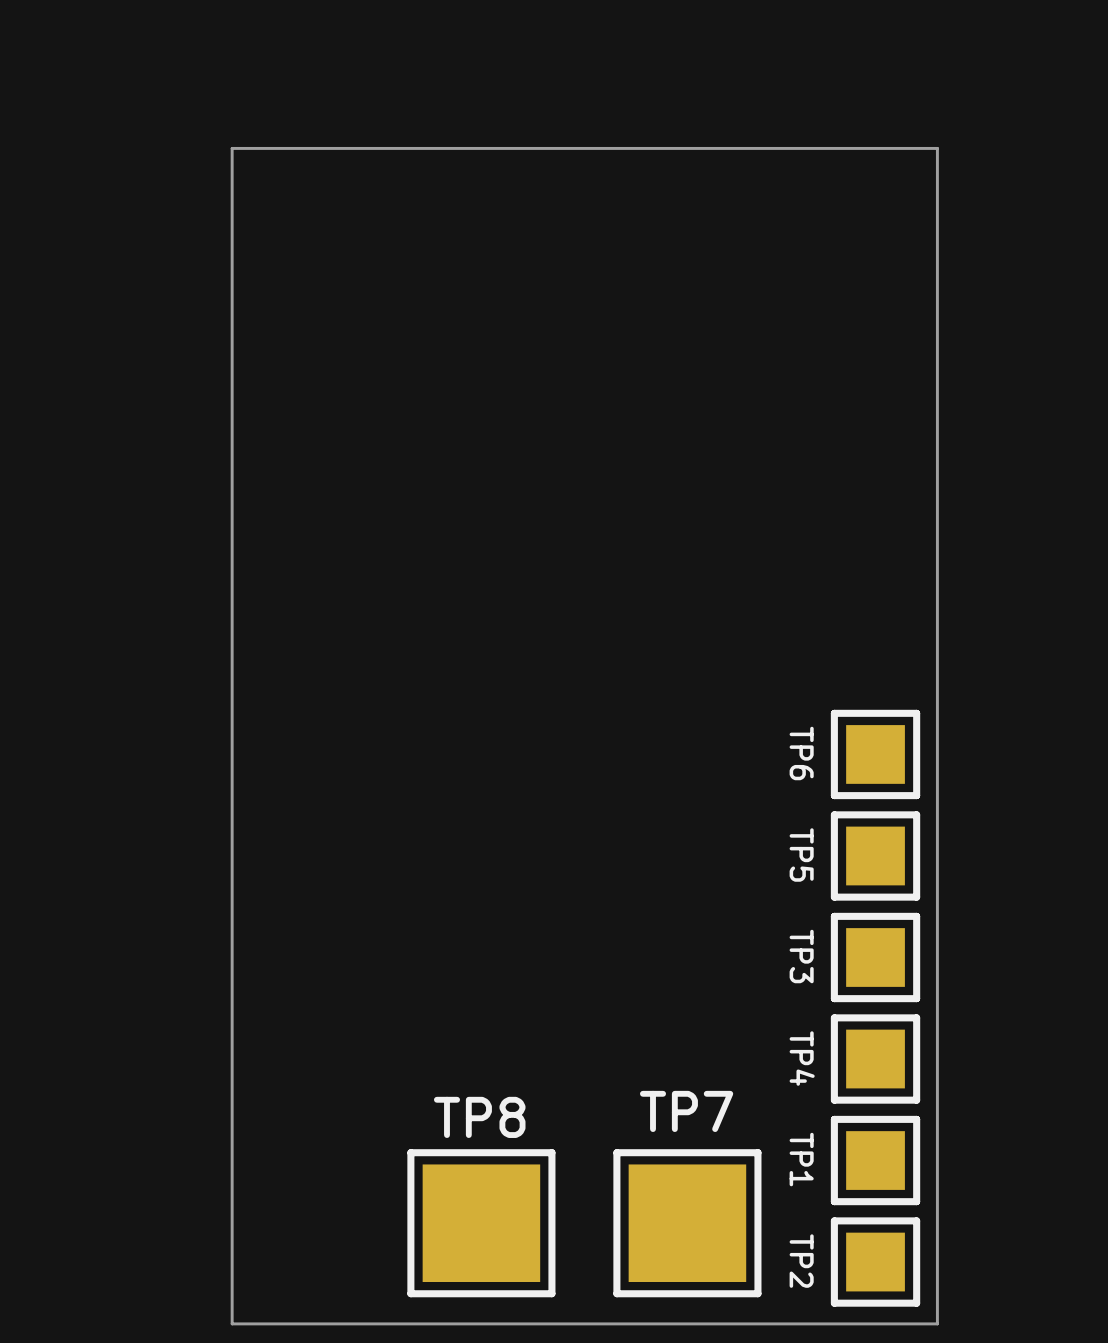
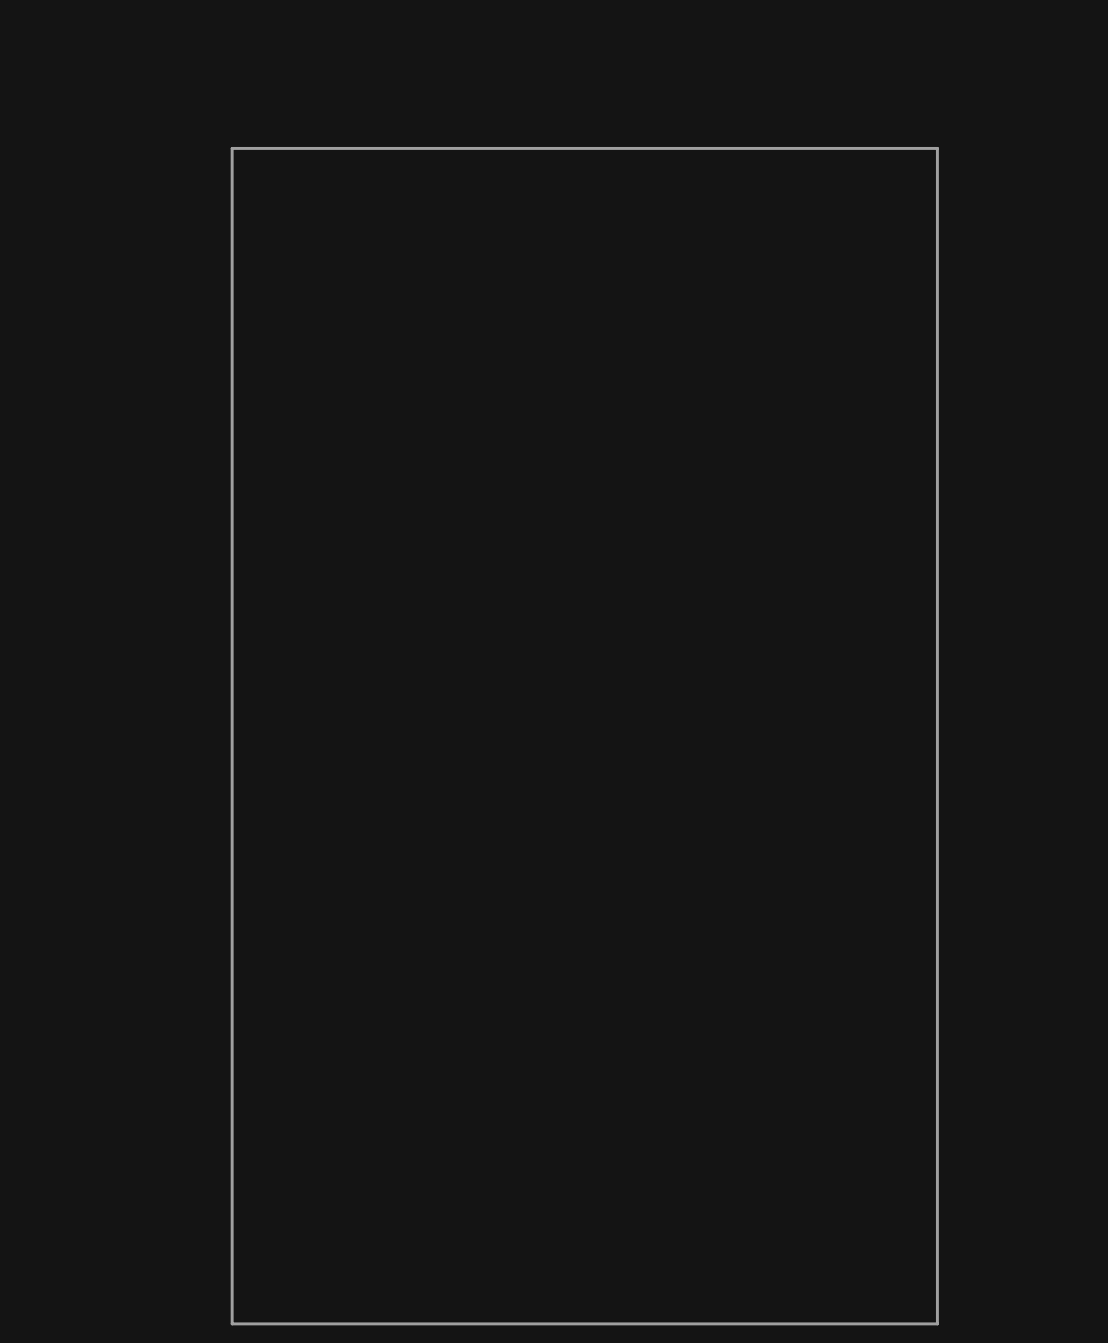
TP6: (875, 754) -> none
TP5: (875, 855) -> none
TP3: (875, 957) -> none
TP4: (875, 1059) -> none
TP1: (875, 1160) -> none
TP8: (481, 1223) -> none
TP7: (687, 1223) -> none
TP2: (875, 1262) -> none

